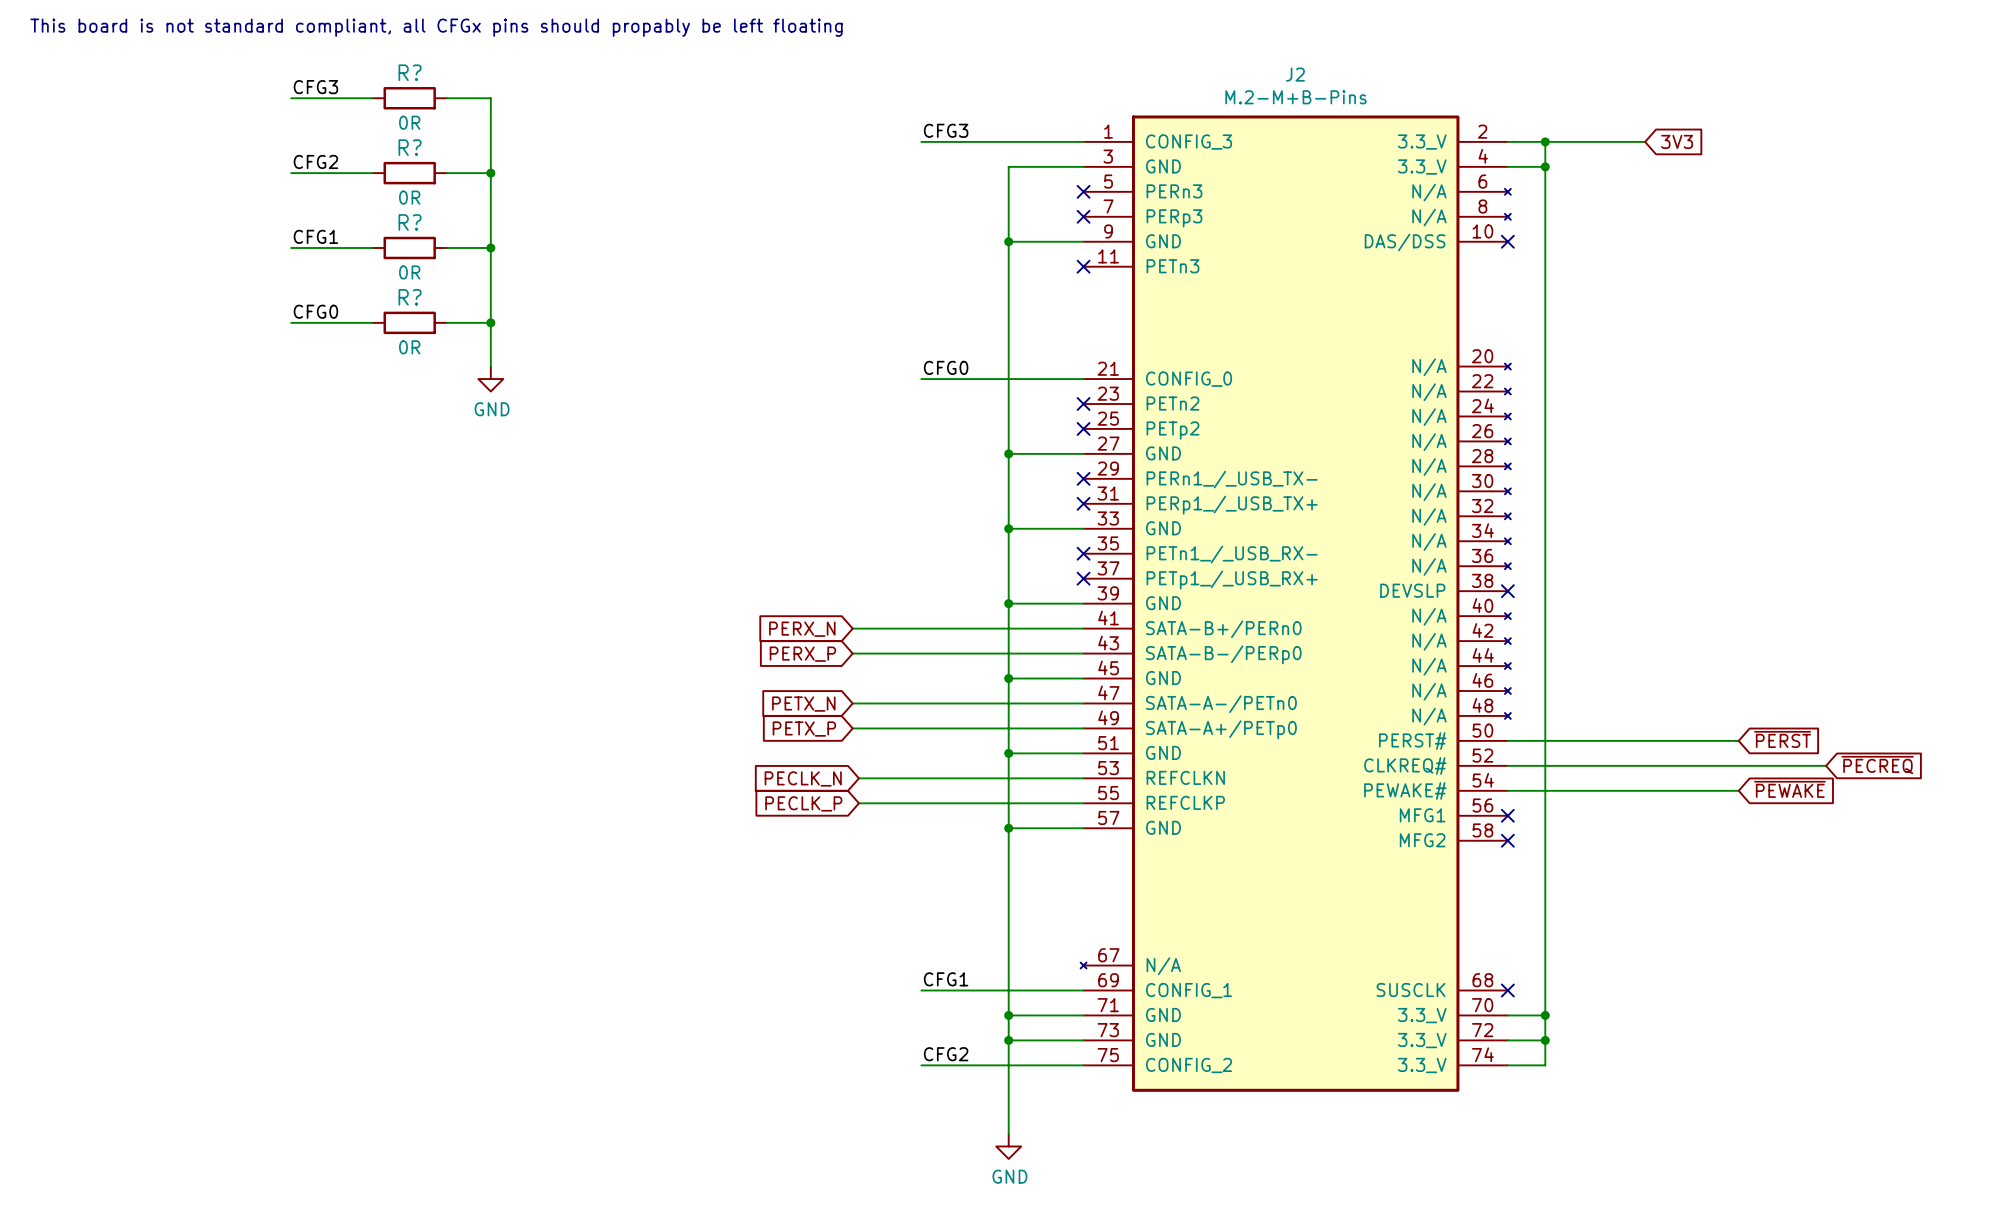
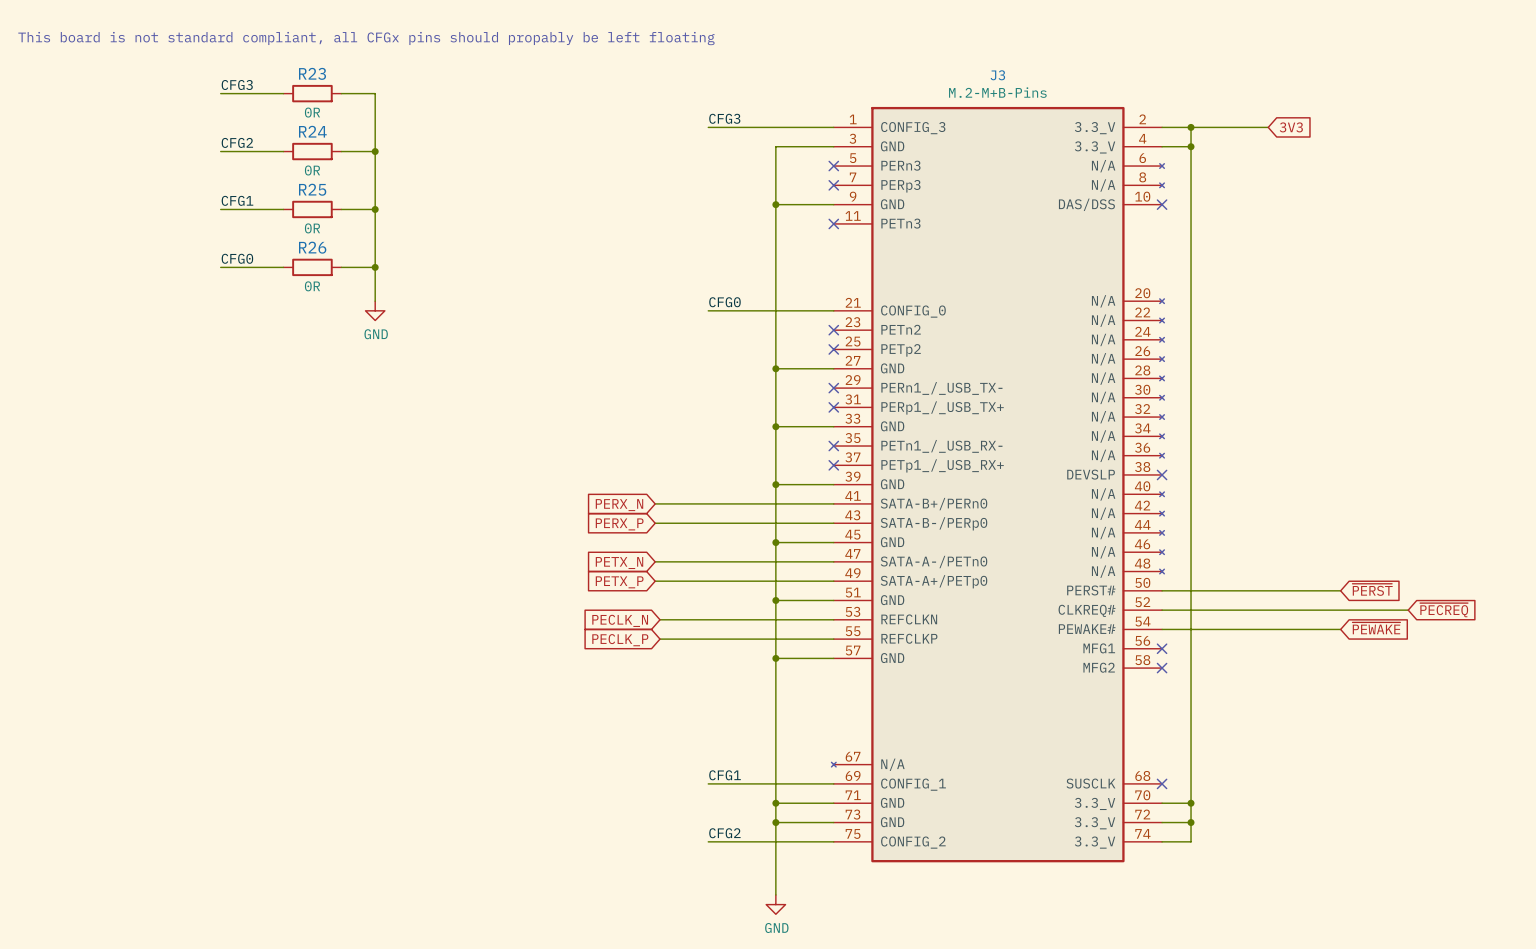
R? name: R? (410, 72) -> R23 (312, 73)
J2 name: J2 (1295, 74) -> J3 (997, 75)
R? name: R? (410, 147) -> R24 (312, 131)
R? name: R? (410, 222) -> R25 (312, 189)
R? name: R? (410, 297) -> R26 (312, 247)

